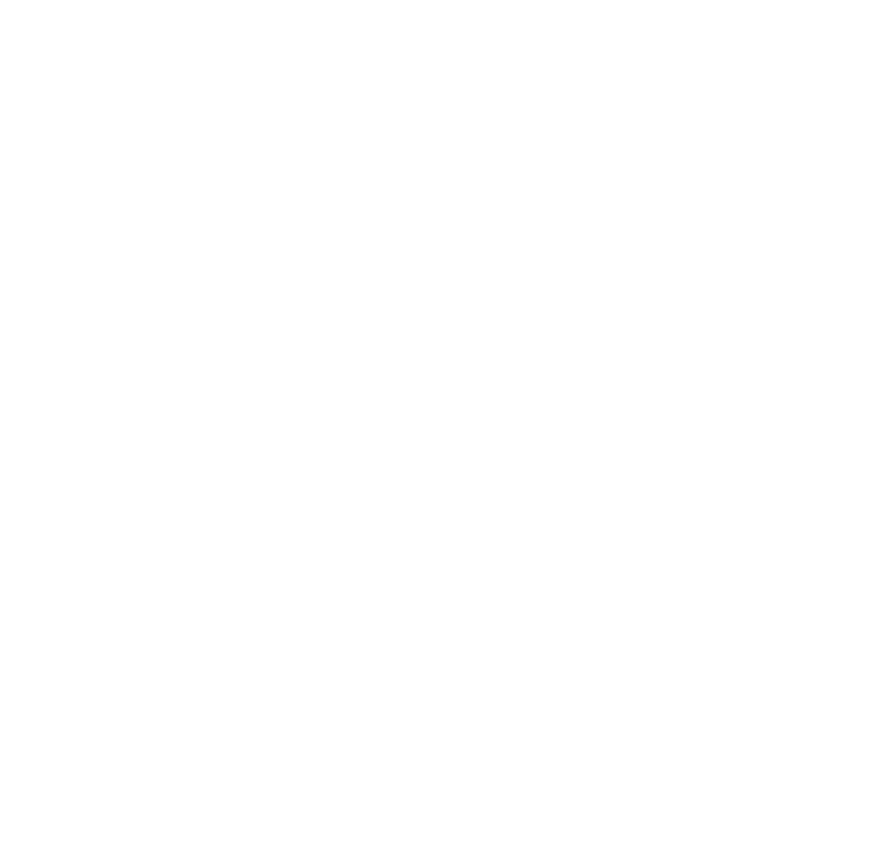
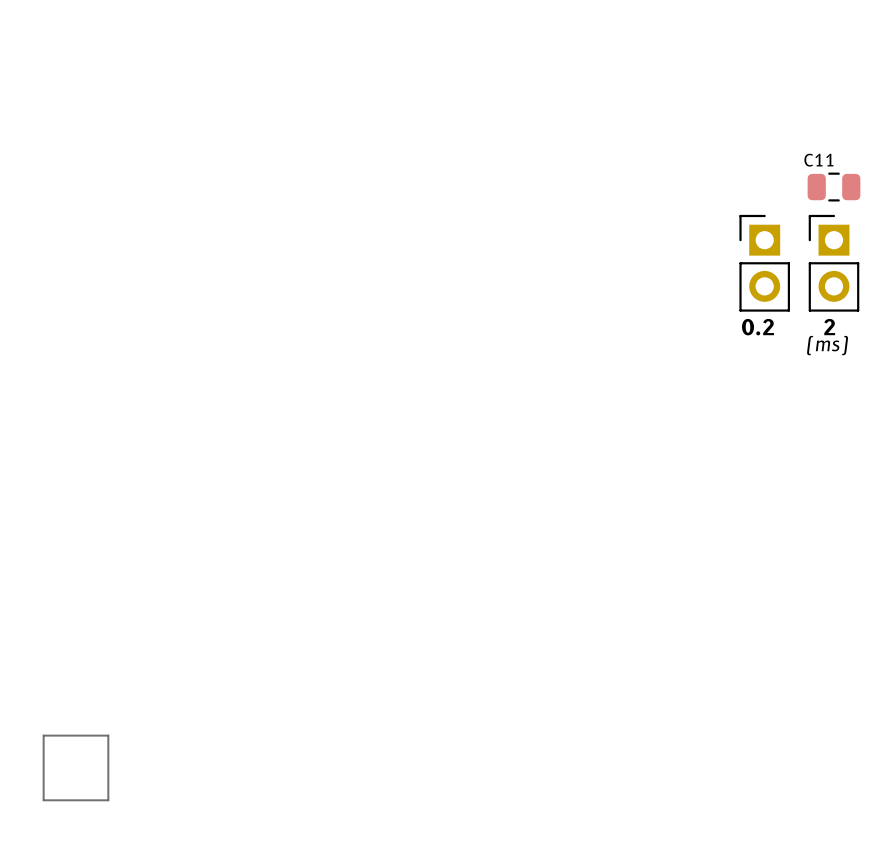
C11: none -> (834, 187)
part: none -> (764, 263)
part: none -> (834, 263)
text: none -> 0.2 (758, 327)
text: none -> 2 (829, 327)
text: none -> (ms) (827, 345)
line: none -> (43, 735) (108, 735) (108, 800) (43, 800) (43, 735)

